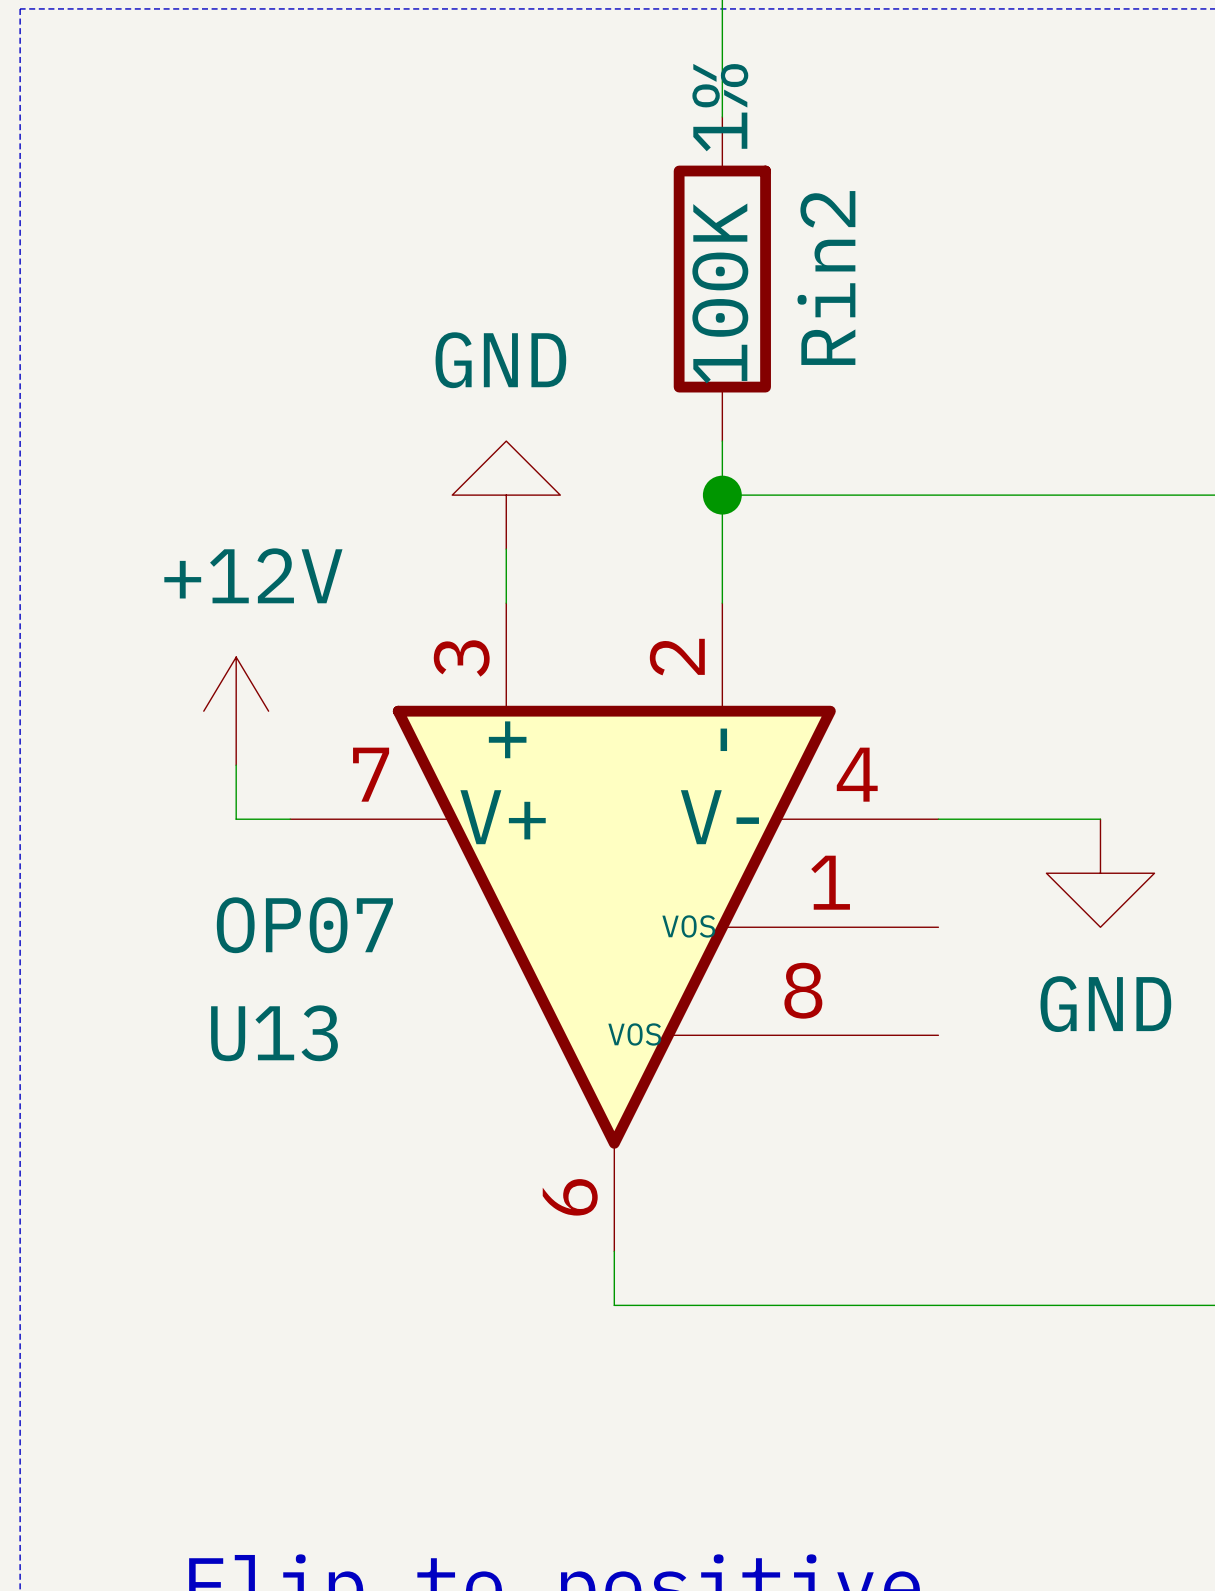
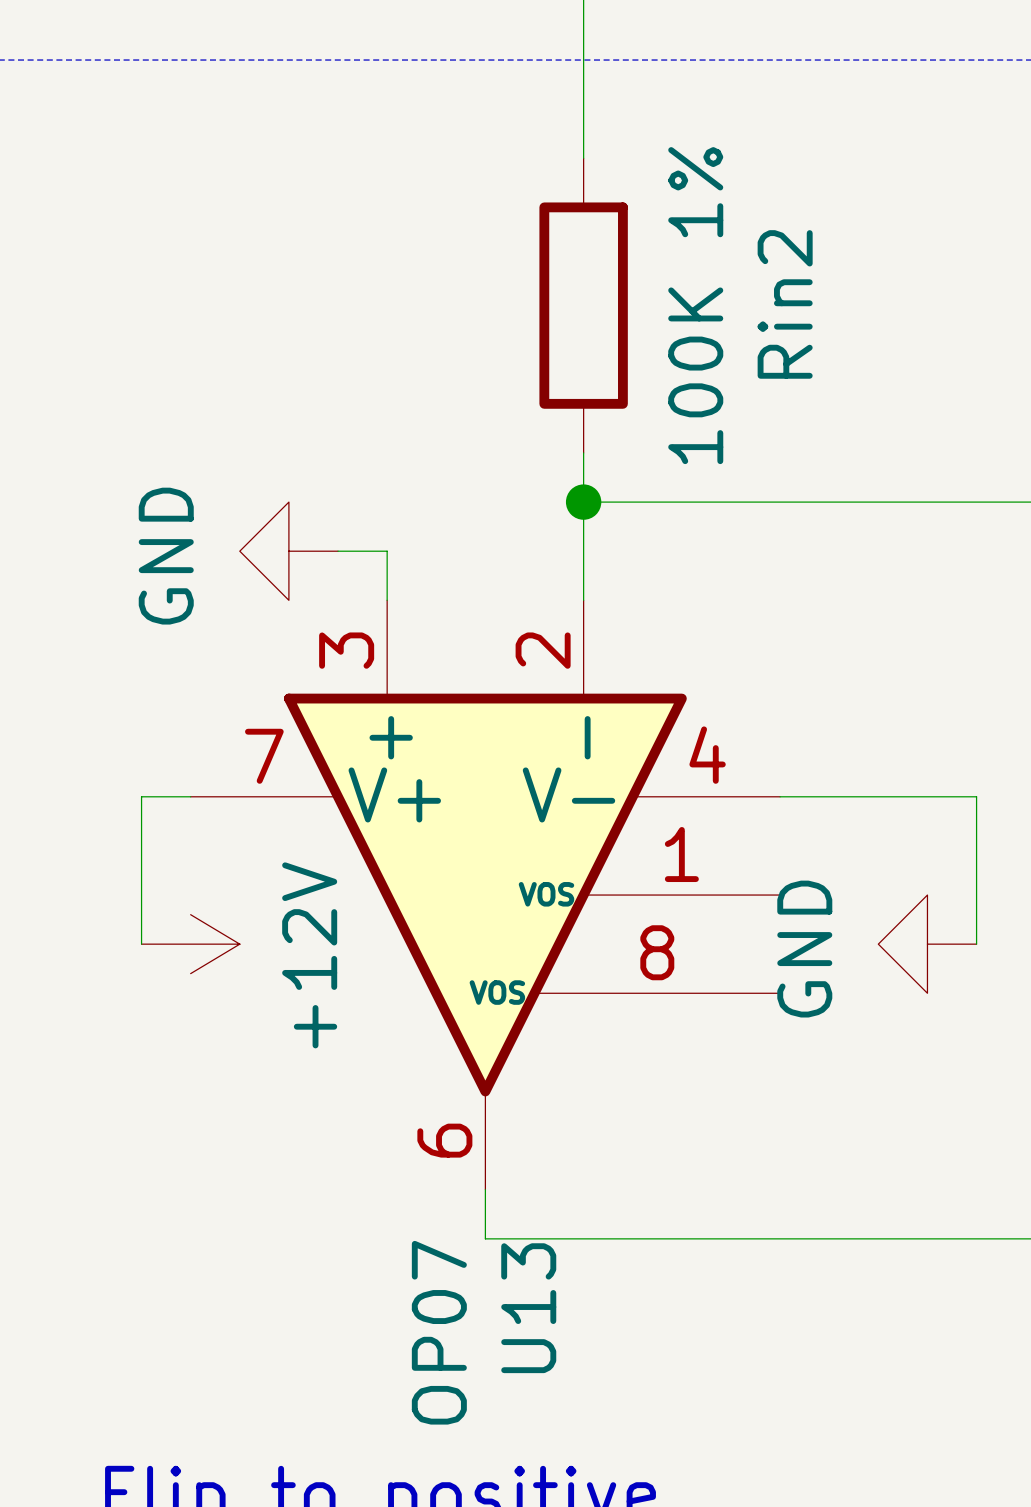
Rin2 value position: 100K 1% (720, 223) -> 100K 1% (695, 305)
Rin2 name position: Rin2 (826, 278) -> Rin2 (785, 304)
power symbol rotation: 0° (506, 495) -> 90° counterclockwise (288, 551)
power symbol position: GND (506, 495) -> GND (288, 551)
wire: none -> (338, 551) (387, 551)
power symbol rotation: 0° (236, 711) -> 90° clockwise (190, 944)
power symbol position: +12V (236, 711) -> +12V (190, 944)
wire: (236, 765) (236, 819) -> (141, 944) (141, 796)
wire: none -> (927, 796) (976, 796) (976, 944)
power symbol rotation: 0° (1100, 873) -> 90° clockwise (927, 944)
power symbol position: GND (1100, 873) -> GND (927, 944)
U13 value rotation: 0° (304, 925) -> 90° counterclockwise (439, 1332)
U13 value position: OP07 (304, 925) -> OP07 (439, 1332)
U13 name rotation: 0° (274, 1033) -> 90° counterclockwise (528, 1308)
U13 name position: U13 (274, 1033) -> U13 (528, 1308)

